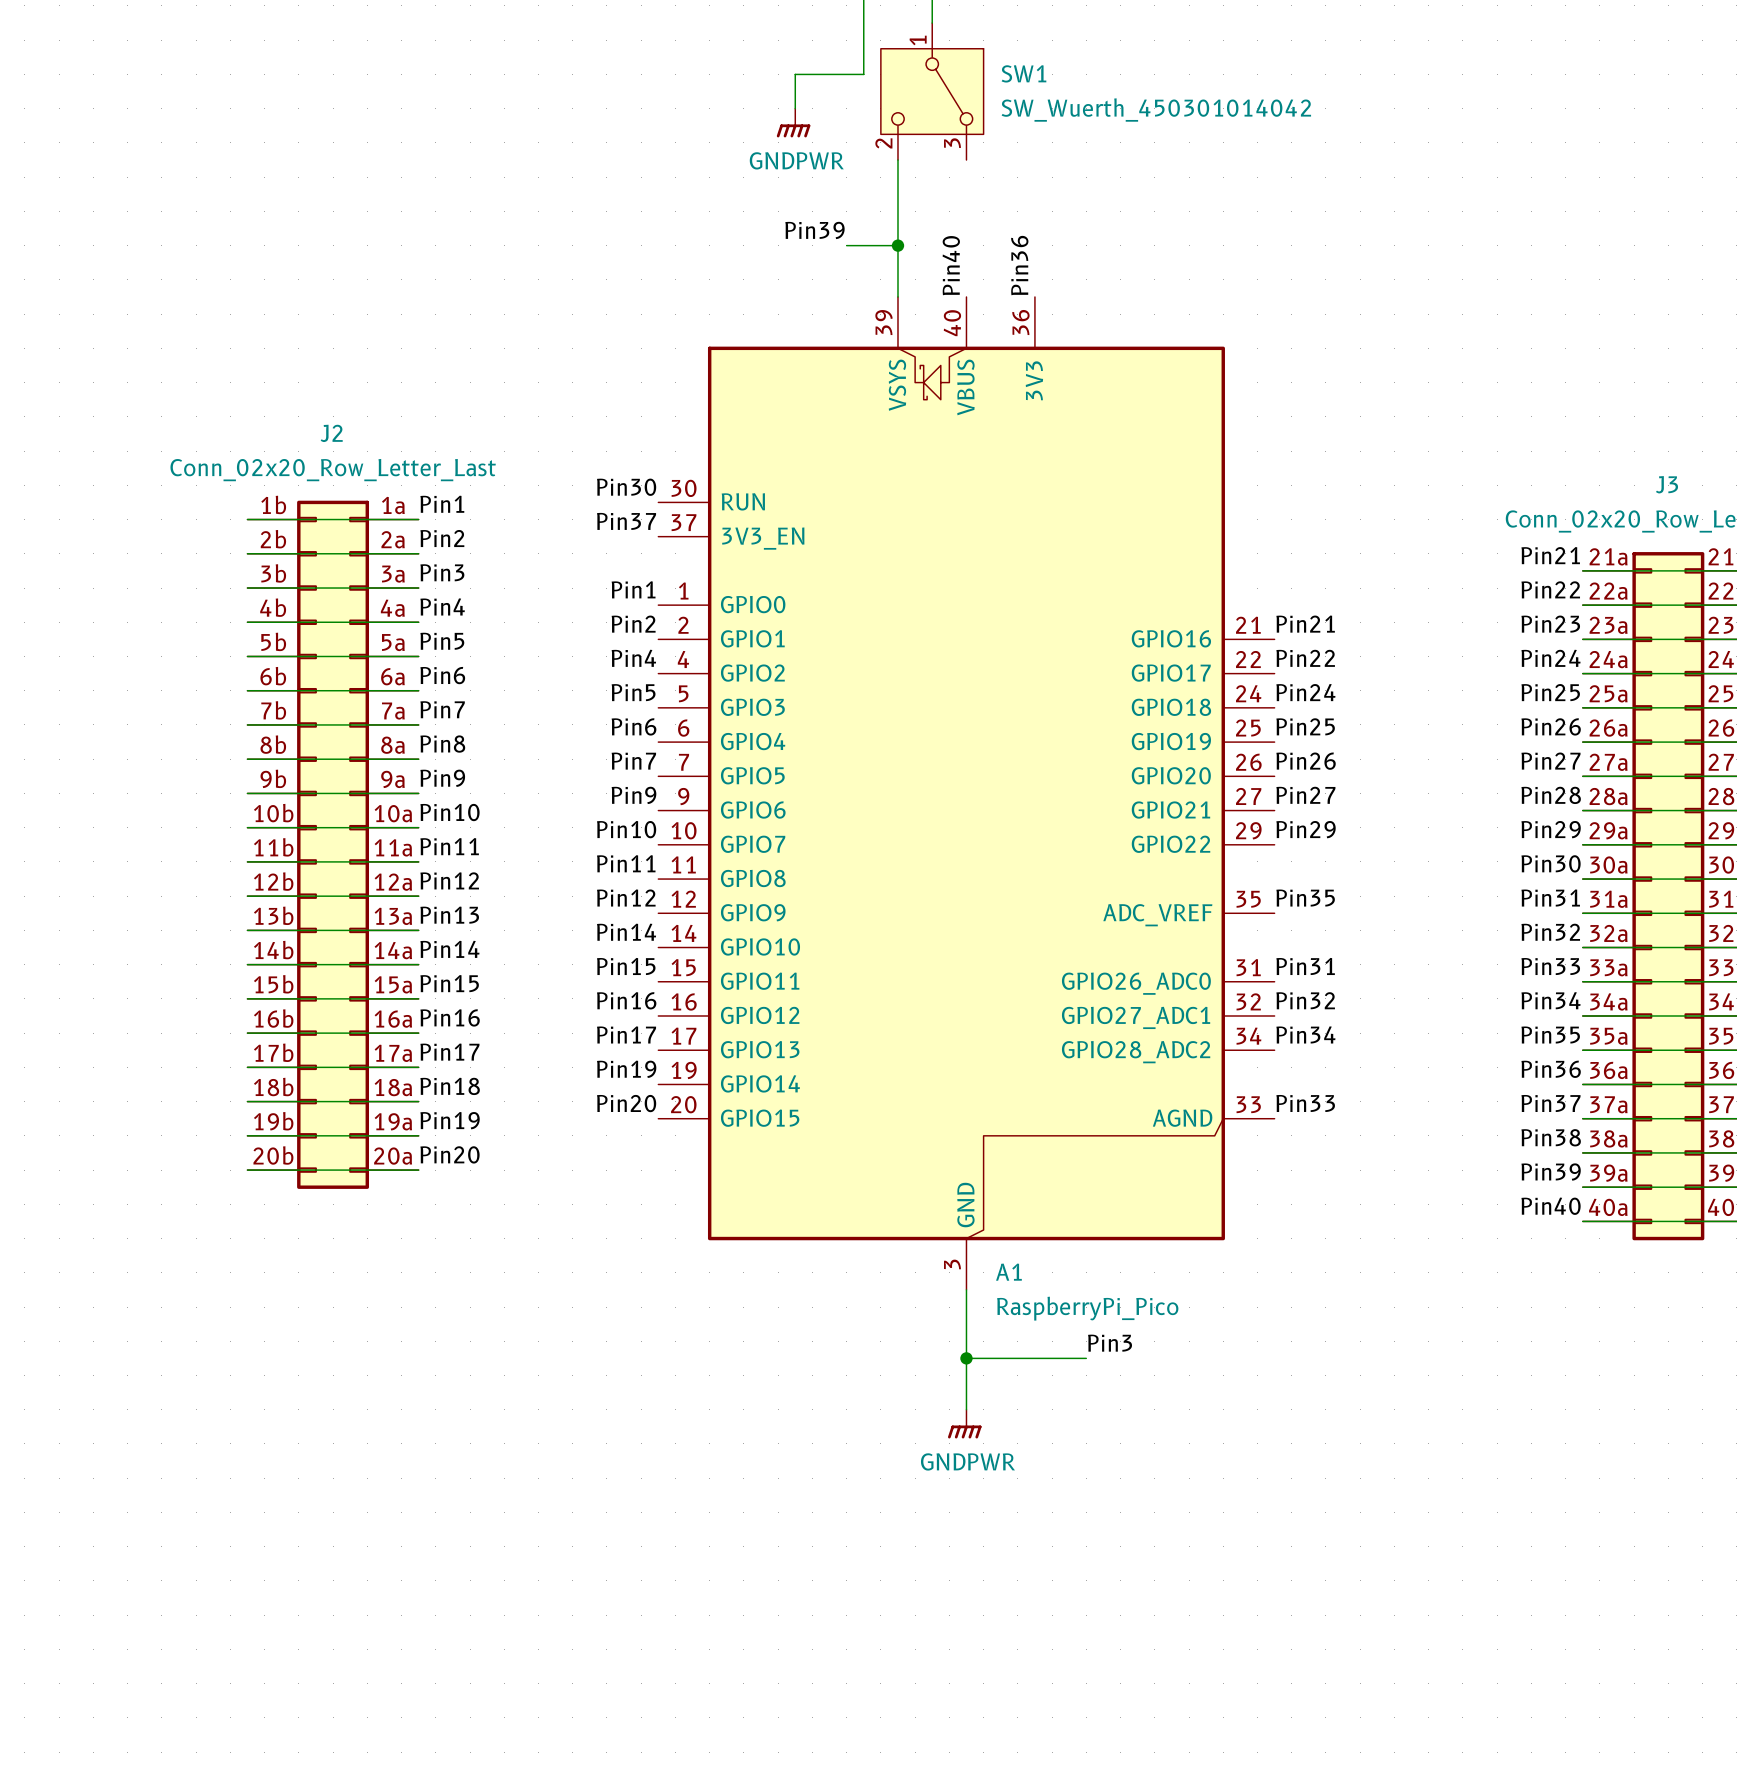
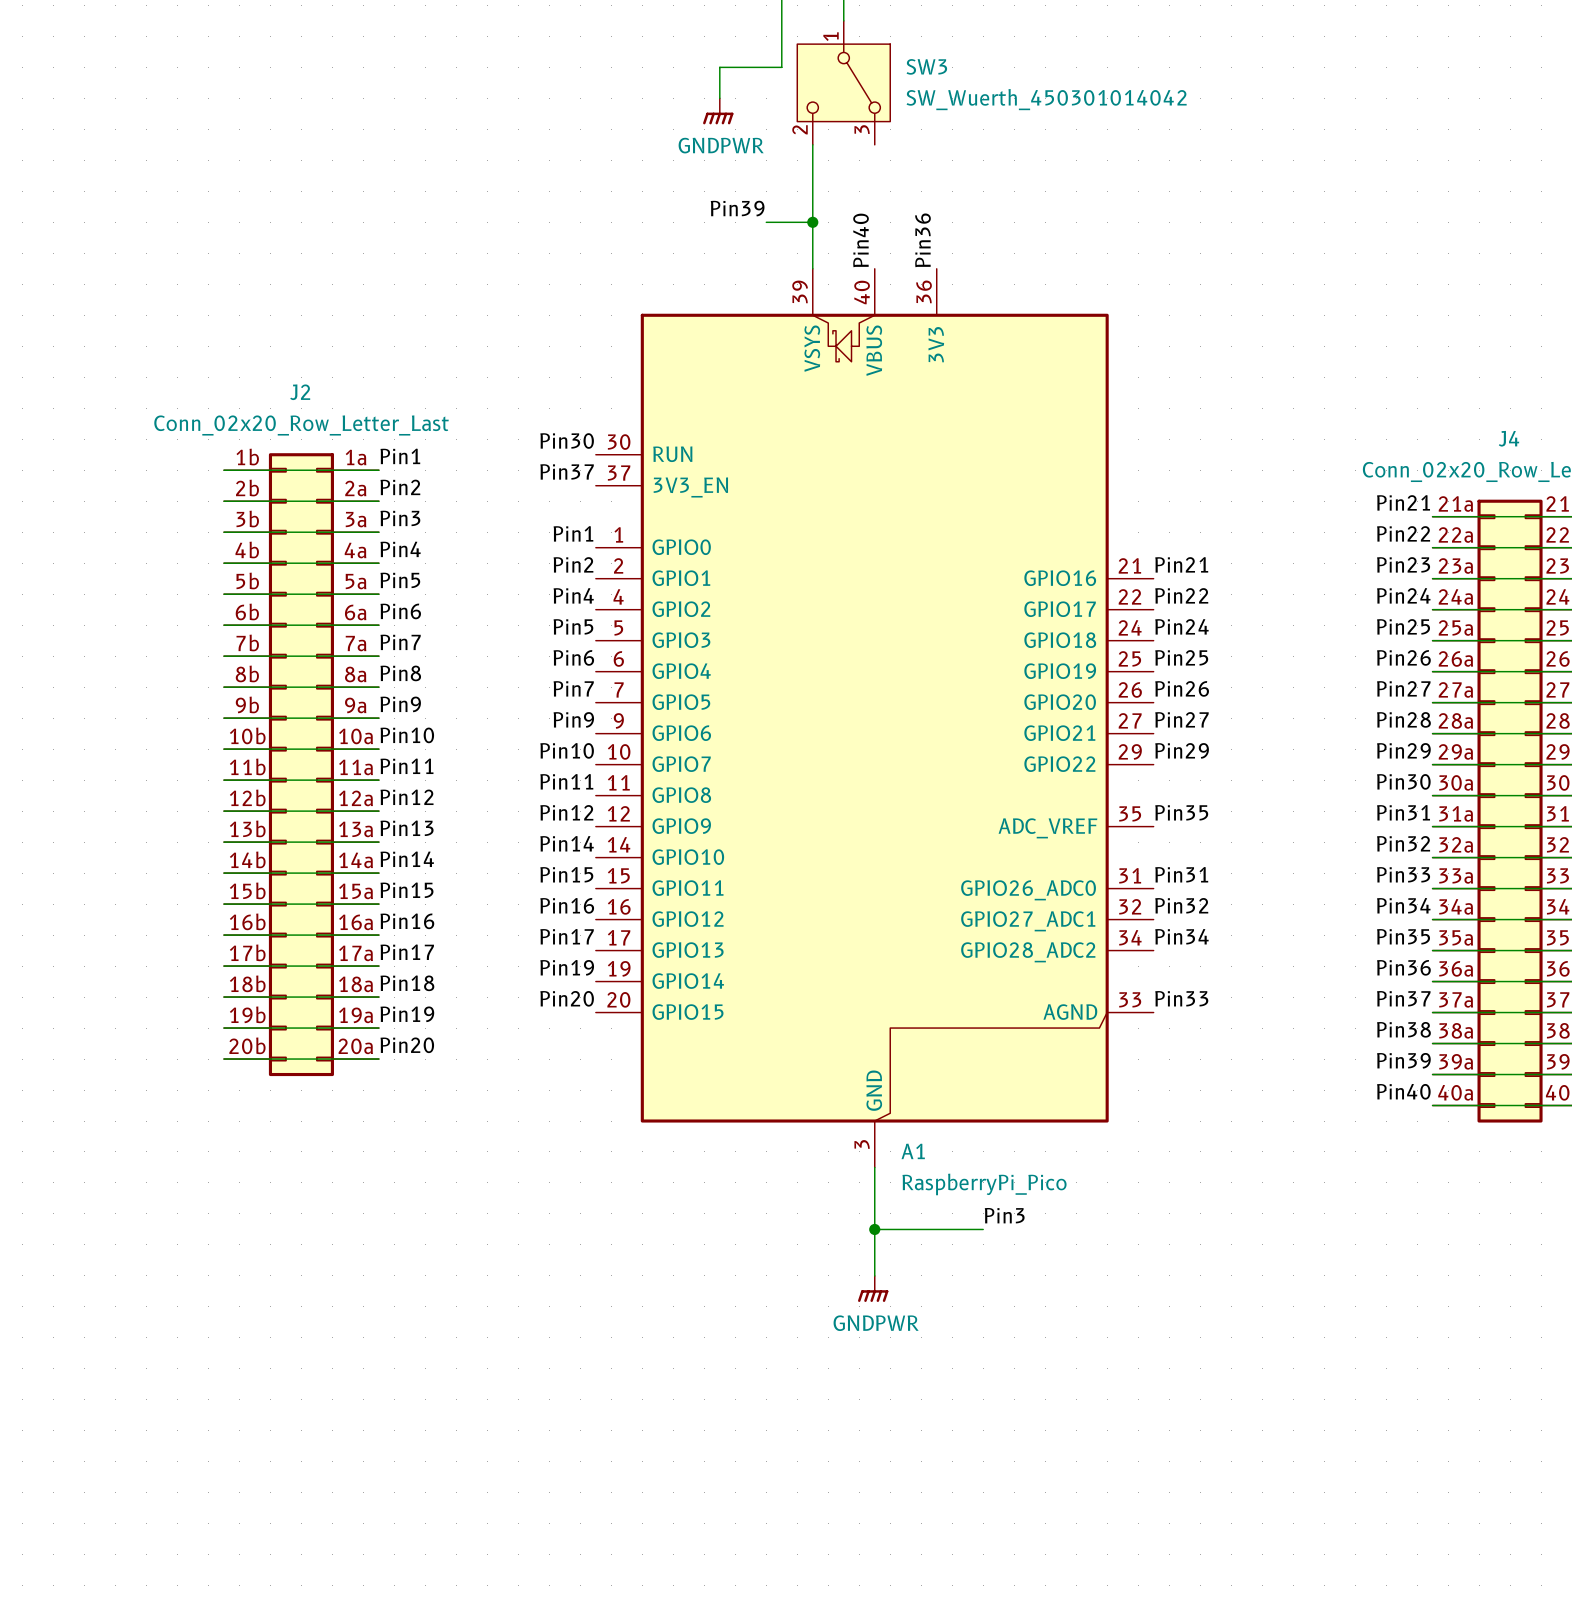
SW1 name: SW1 (1023, 73) -> SW3 (926, 66)
J3 name: J3 (1667, 484) -> J4 (1509, 438)

